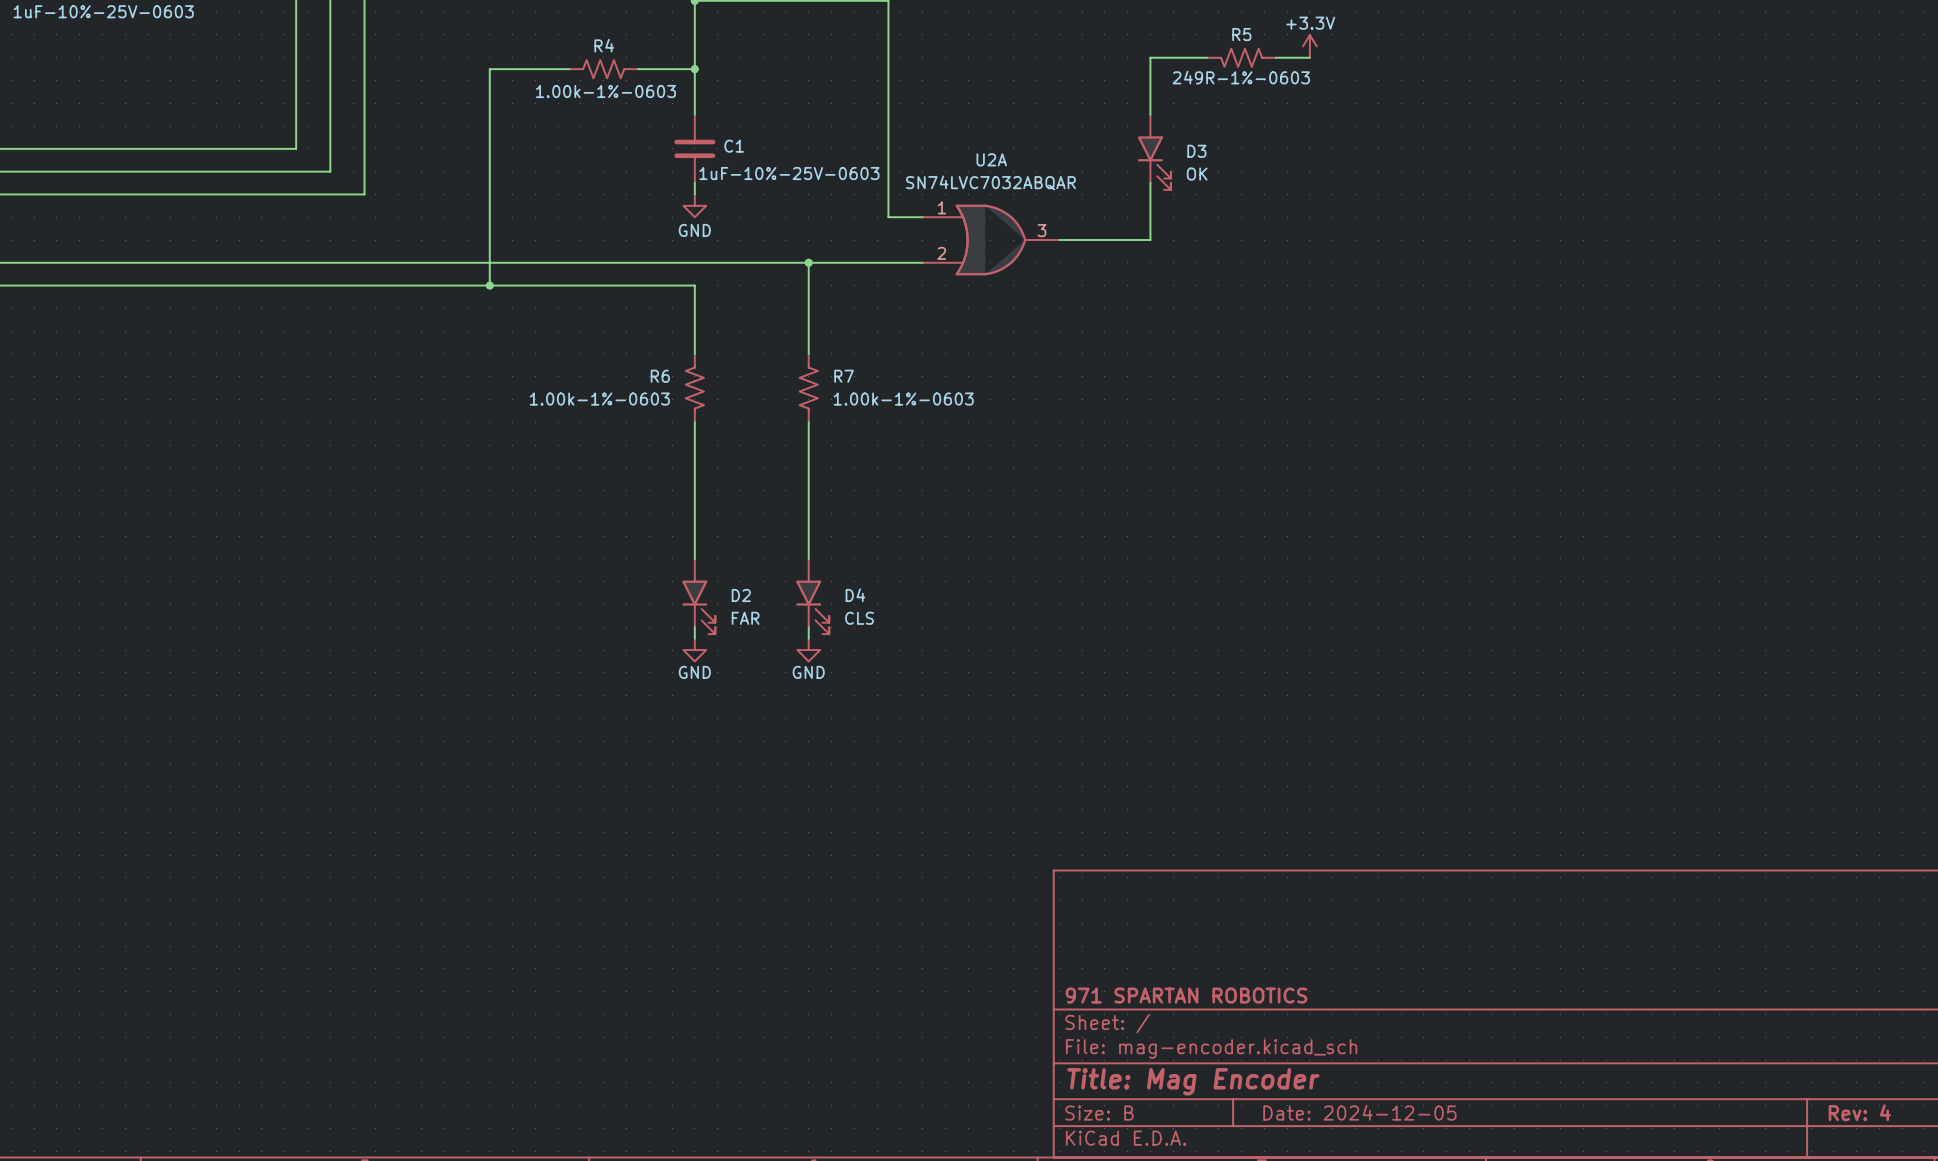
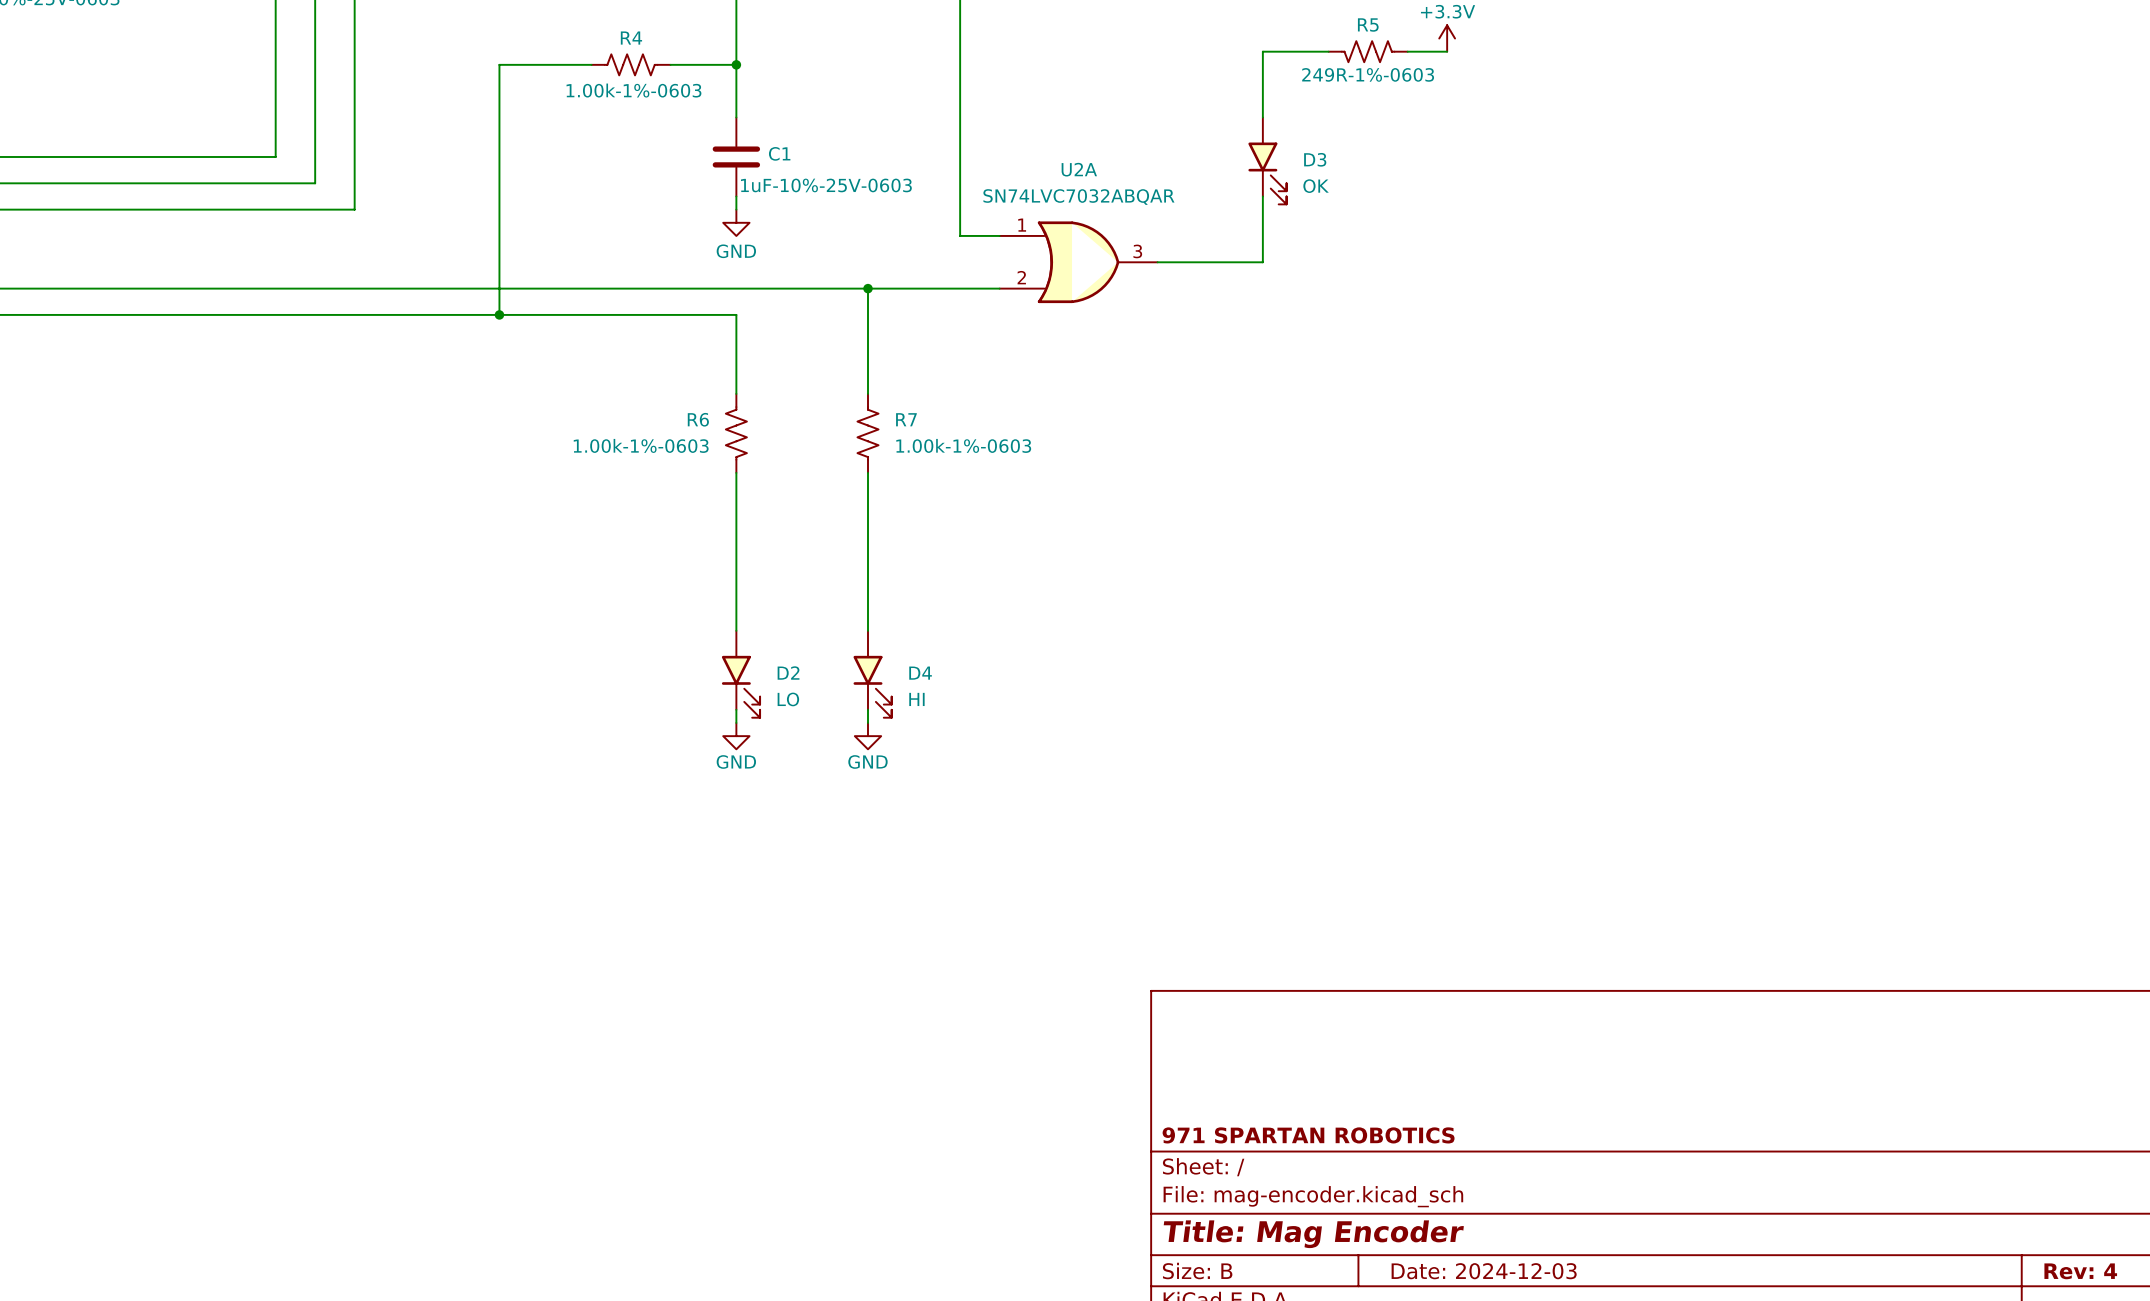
D2 value: FAR (745, 618) -> LO (788, 699)
D4 value: CLS (859, 618) -> HI (916, 699)
title block: Date: 2024-12-05 (1359, 1112) -> Date: 2024-12-03 (1484, 1271)

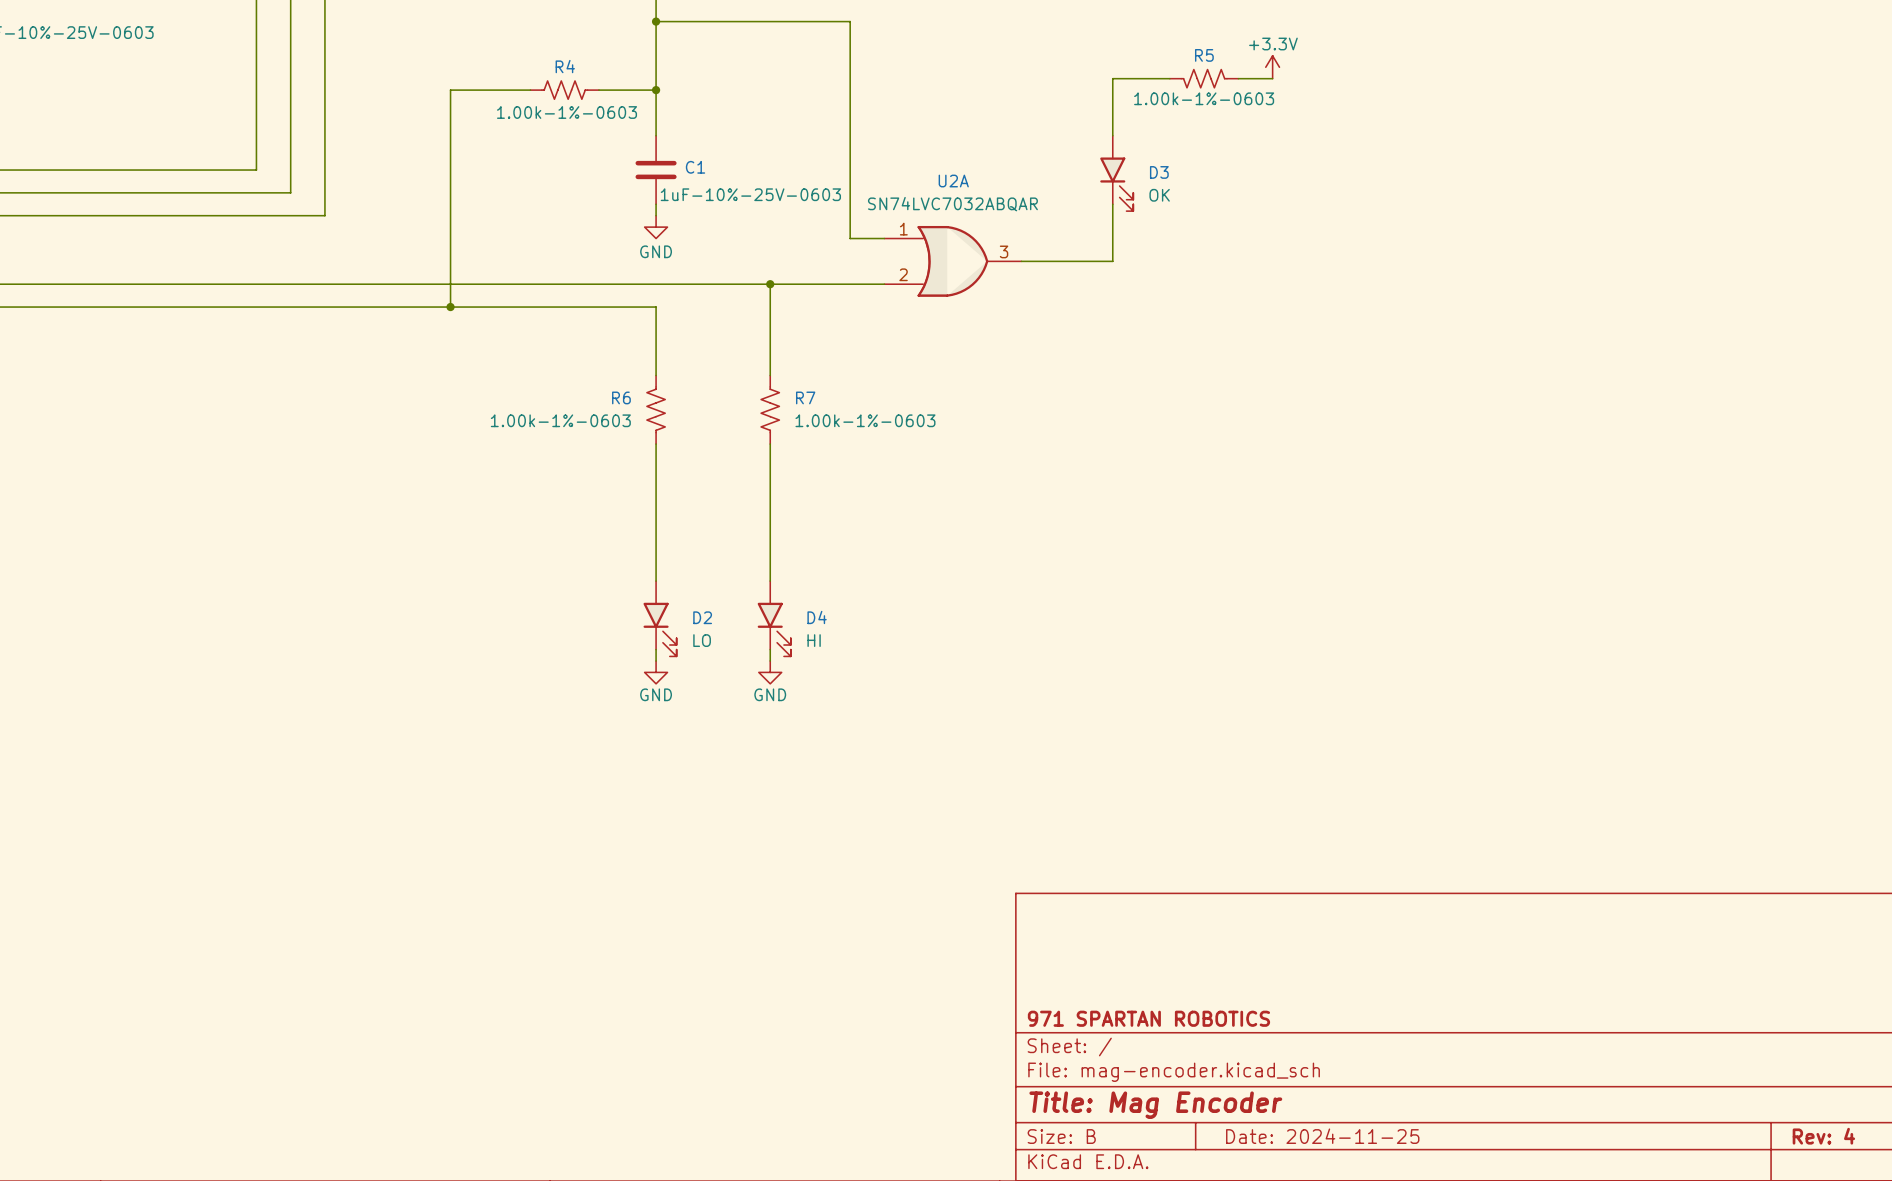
R5 value: 249R-1%-0603 (1368, 74) -> 1.00k-1%-0603 (1204, 98)
title block: Date: 2024-12-03 (1484, 1271) -> Date: 2024-11-25 (1322, 1136)

